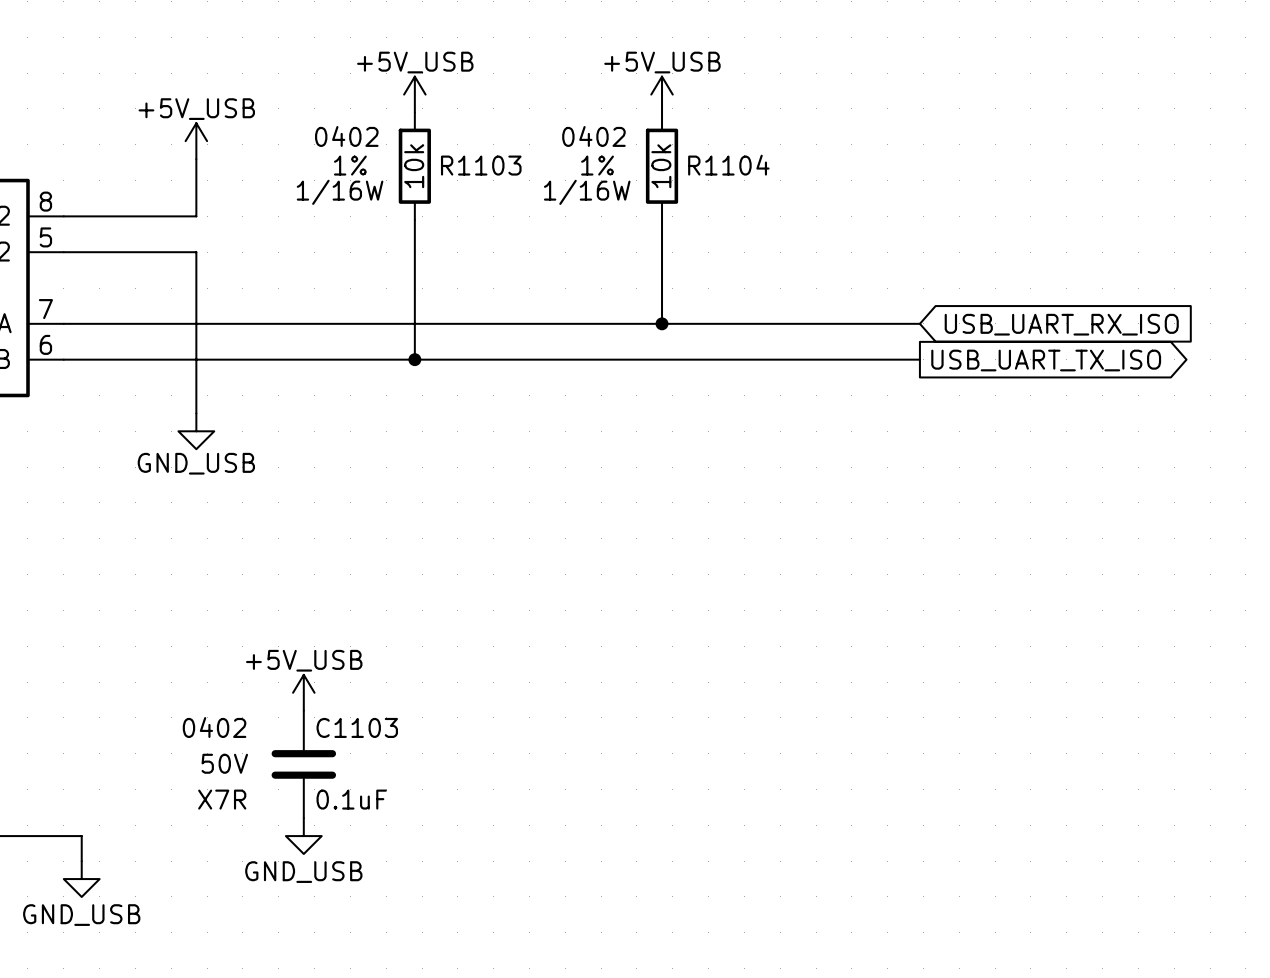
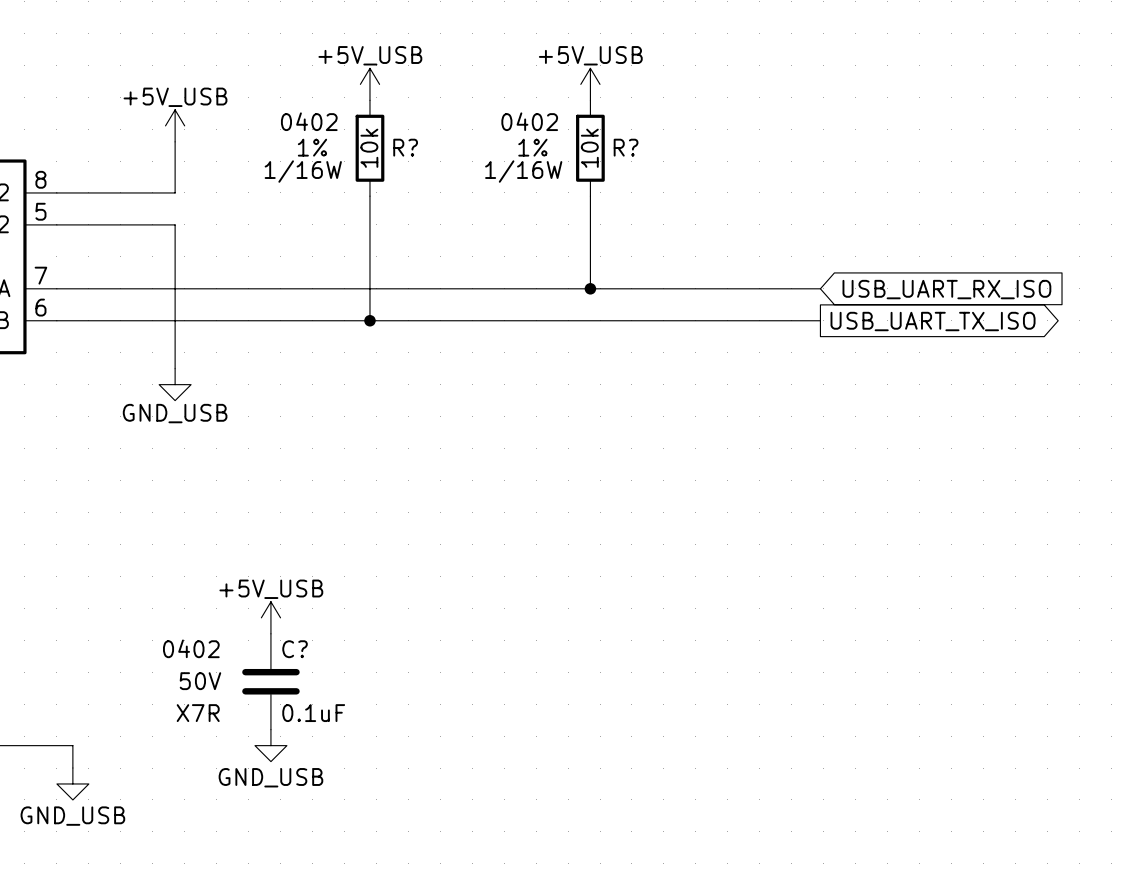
R1103 name: R1103 (481, 165) -> R? (405, 147)
R1104 name: R1104 (728, 165) -> R? (626, 147)
C1103 name: C1103 (357, 727) -> C? (295, 649)

